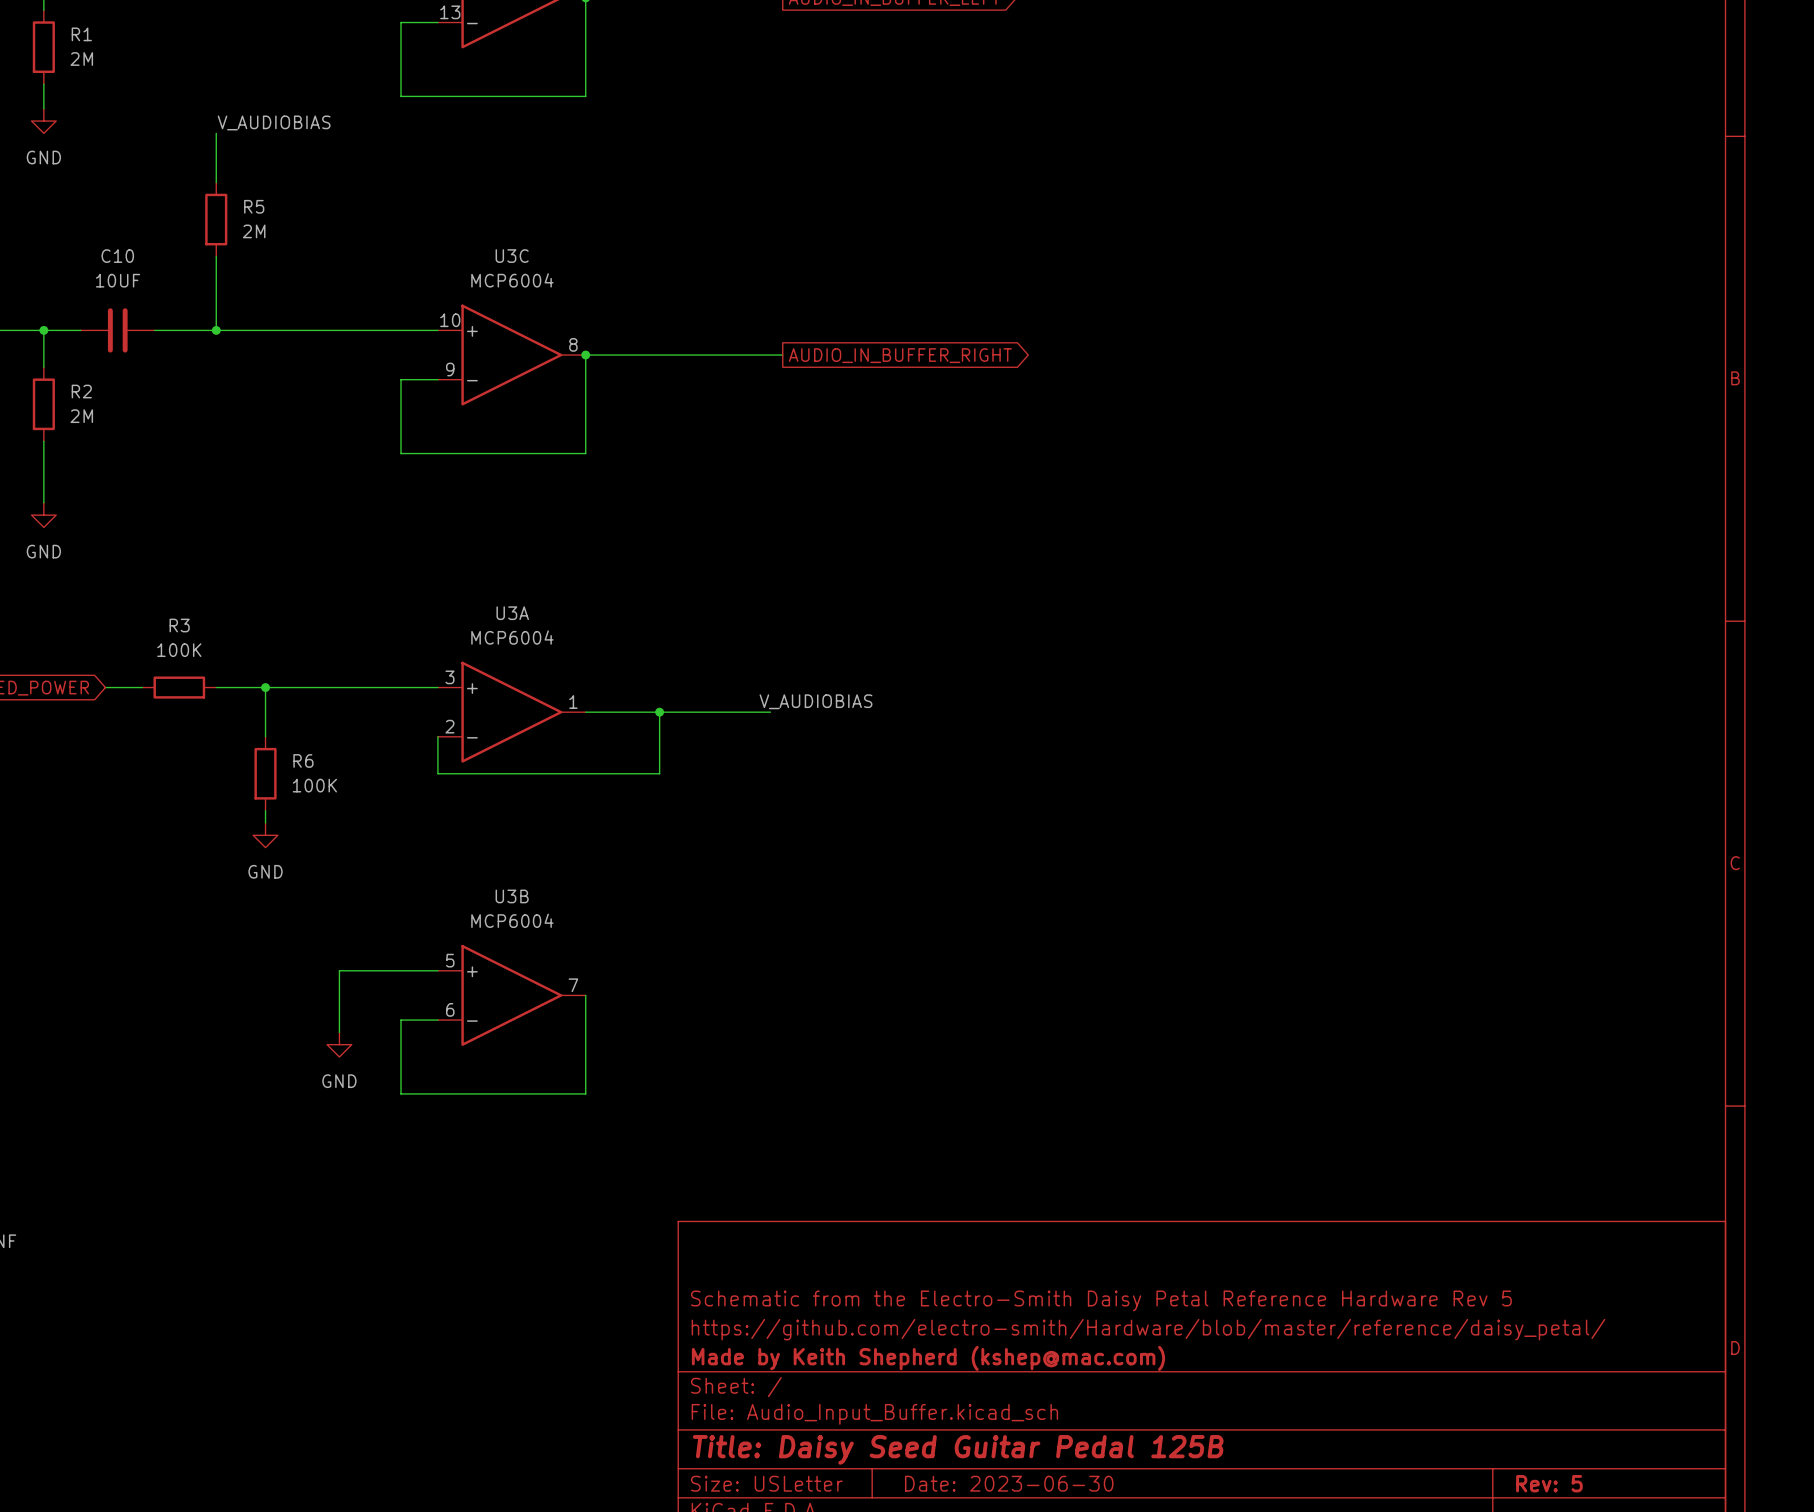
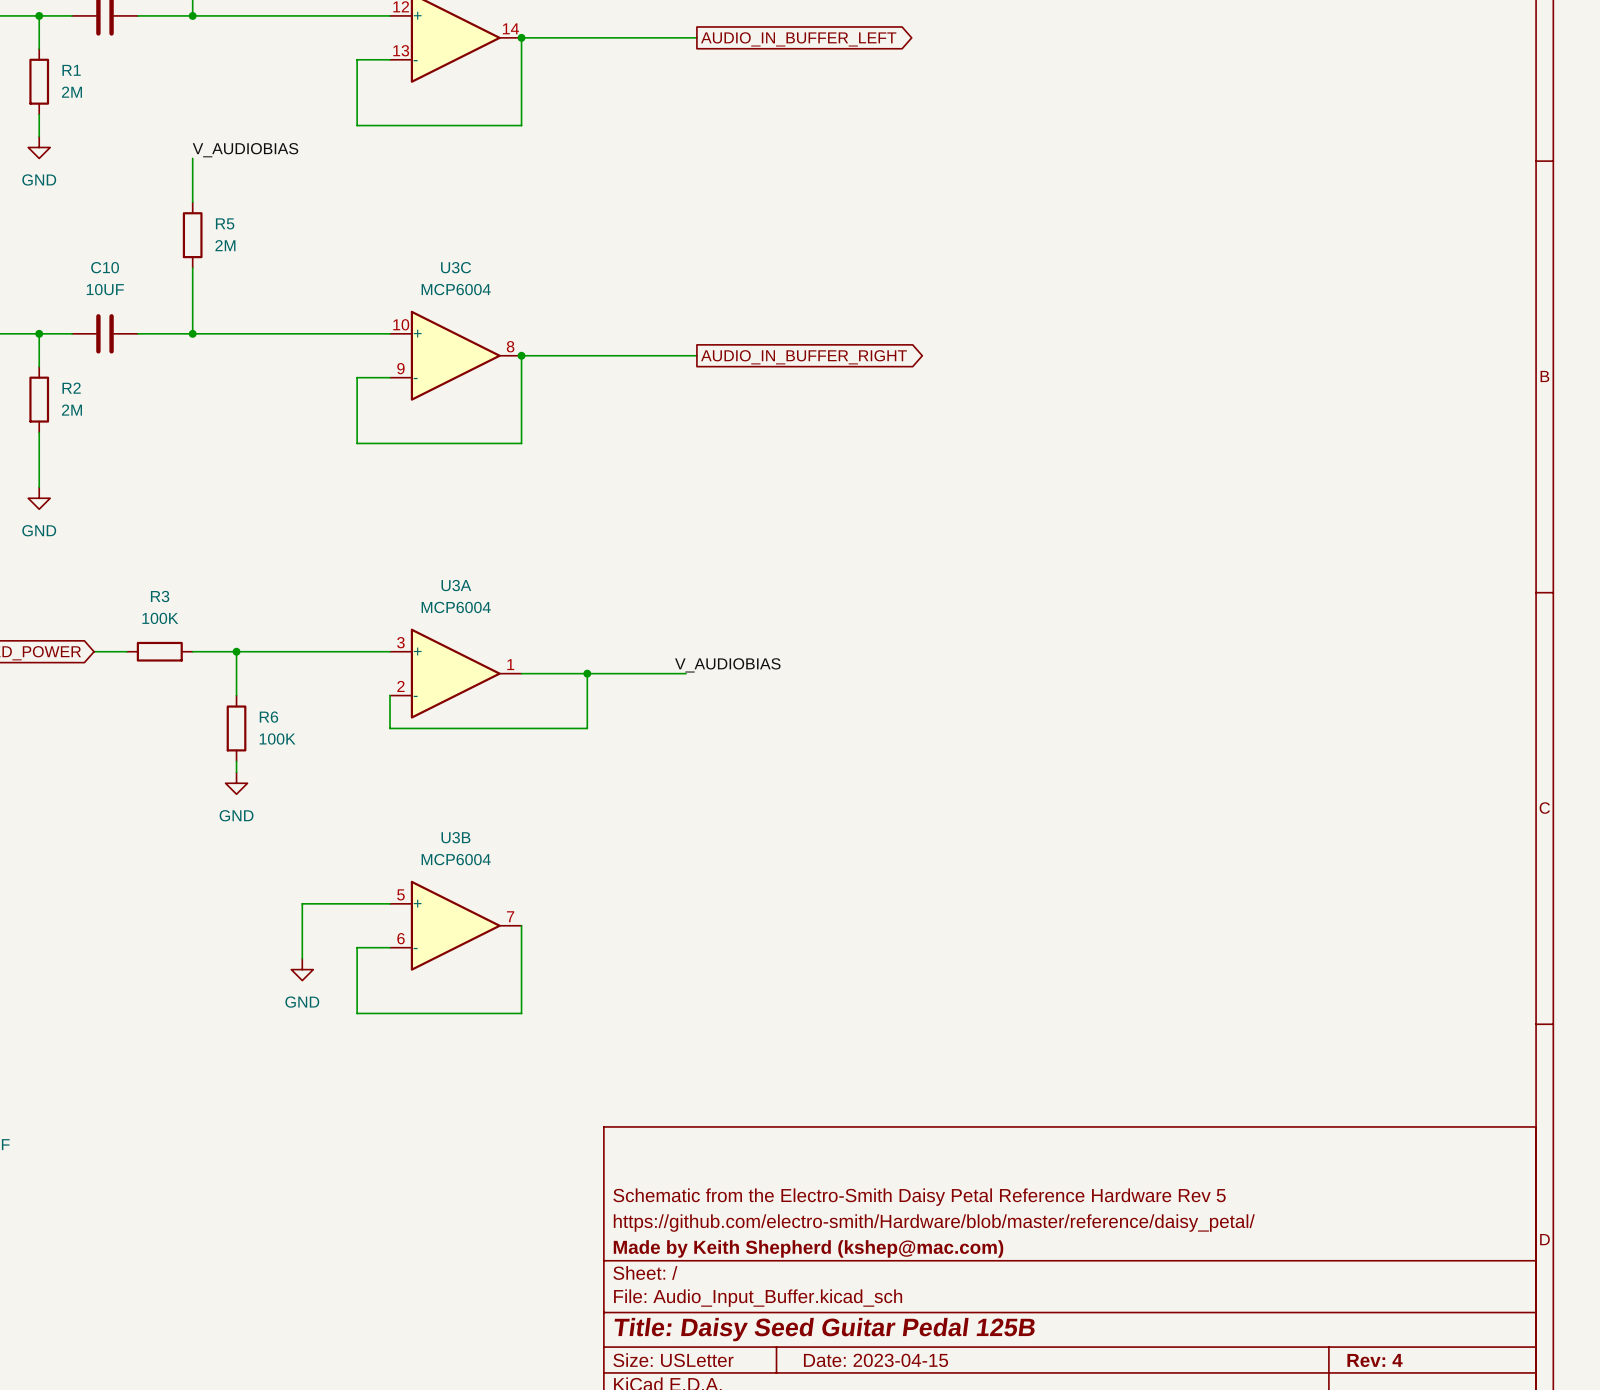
title block: Date: 2023-06-30 (1009, 1483) -> Date: 2023-04-15 (876, 1360)
title block: Rev: 5 (1549, 1483) -> Rev: 4 (1374, 1360)

